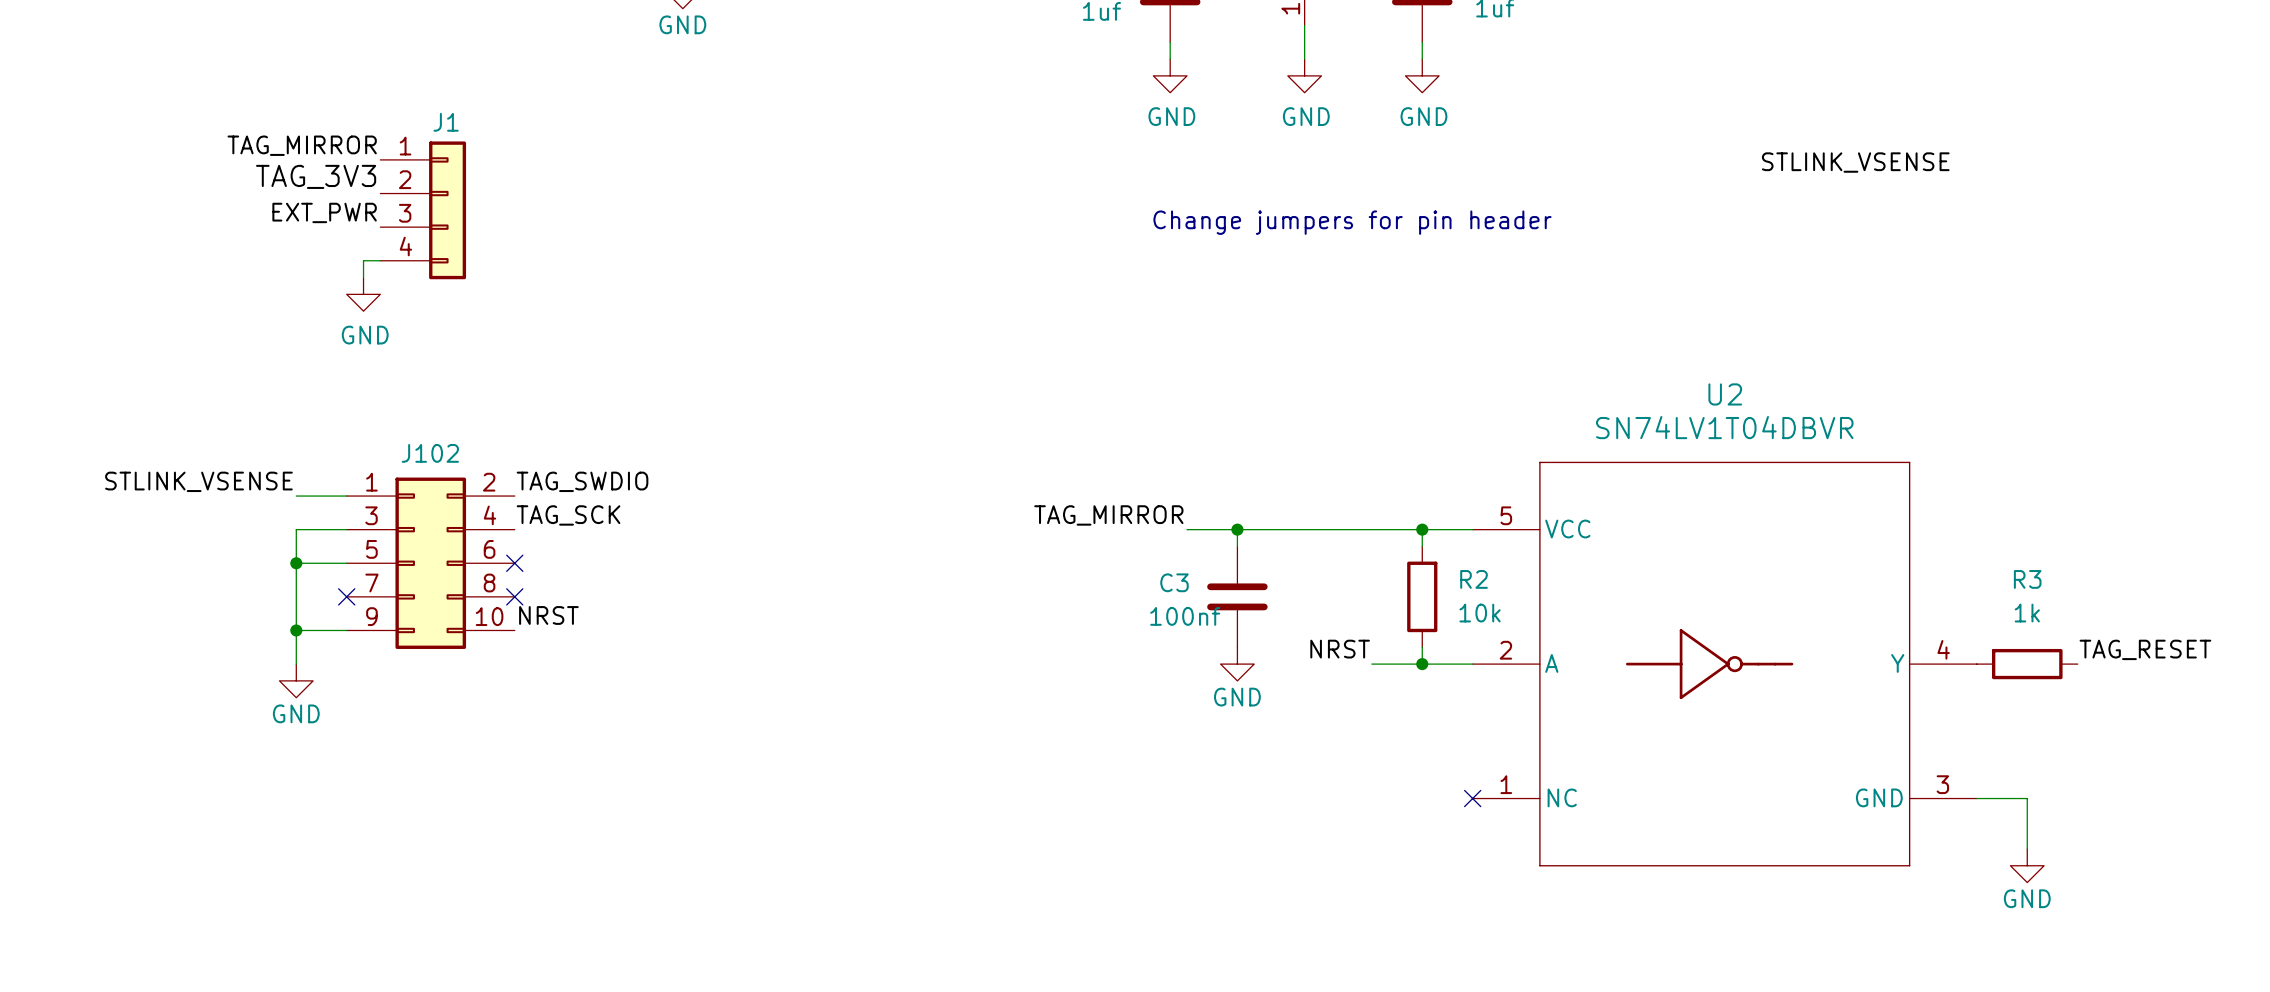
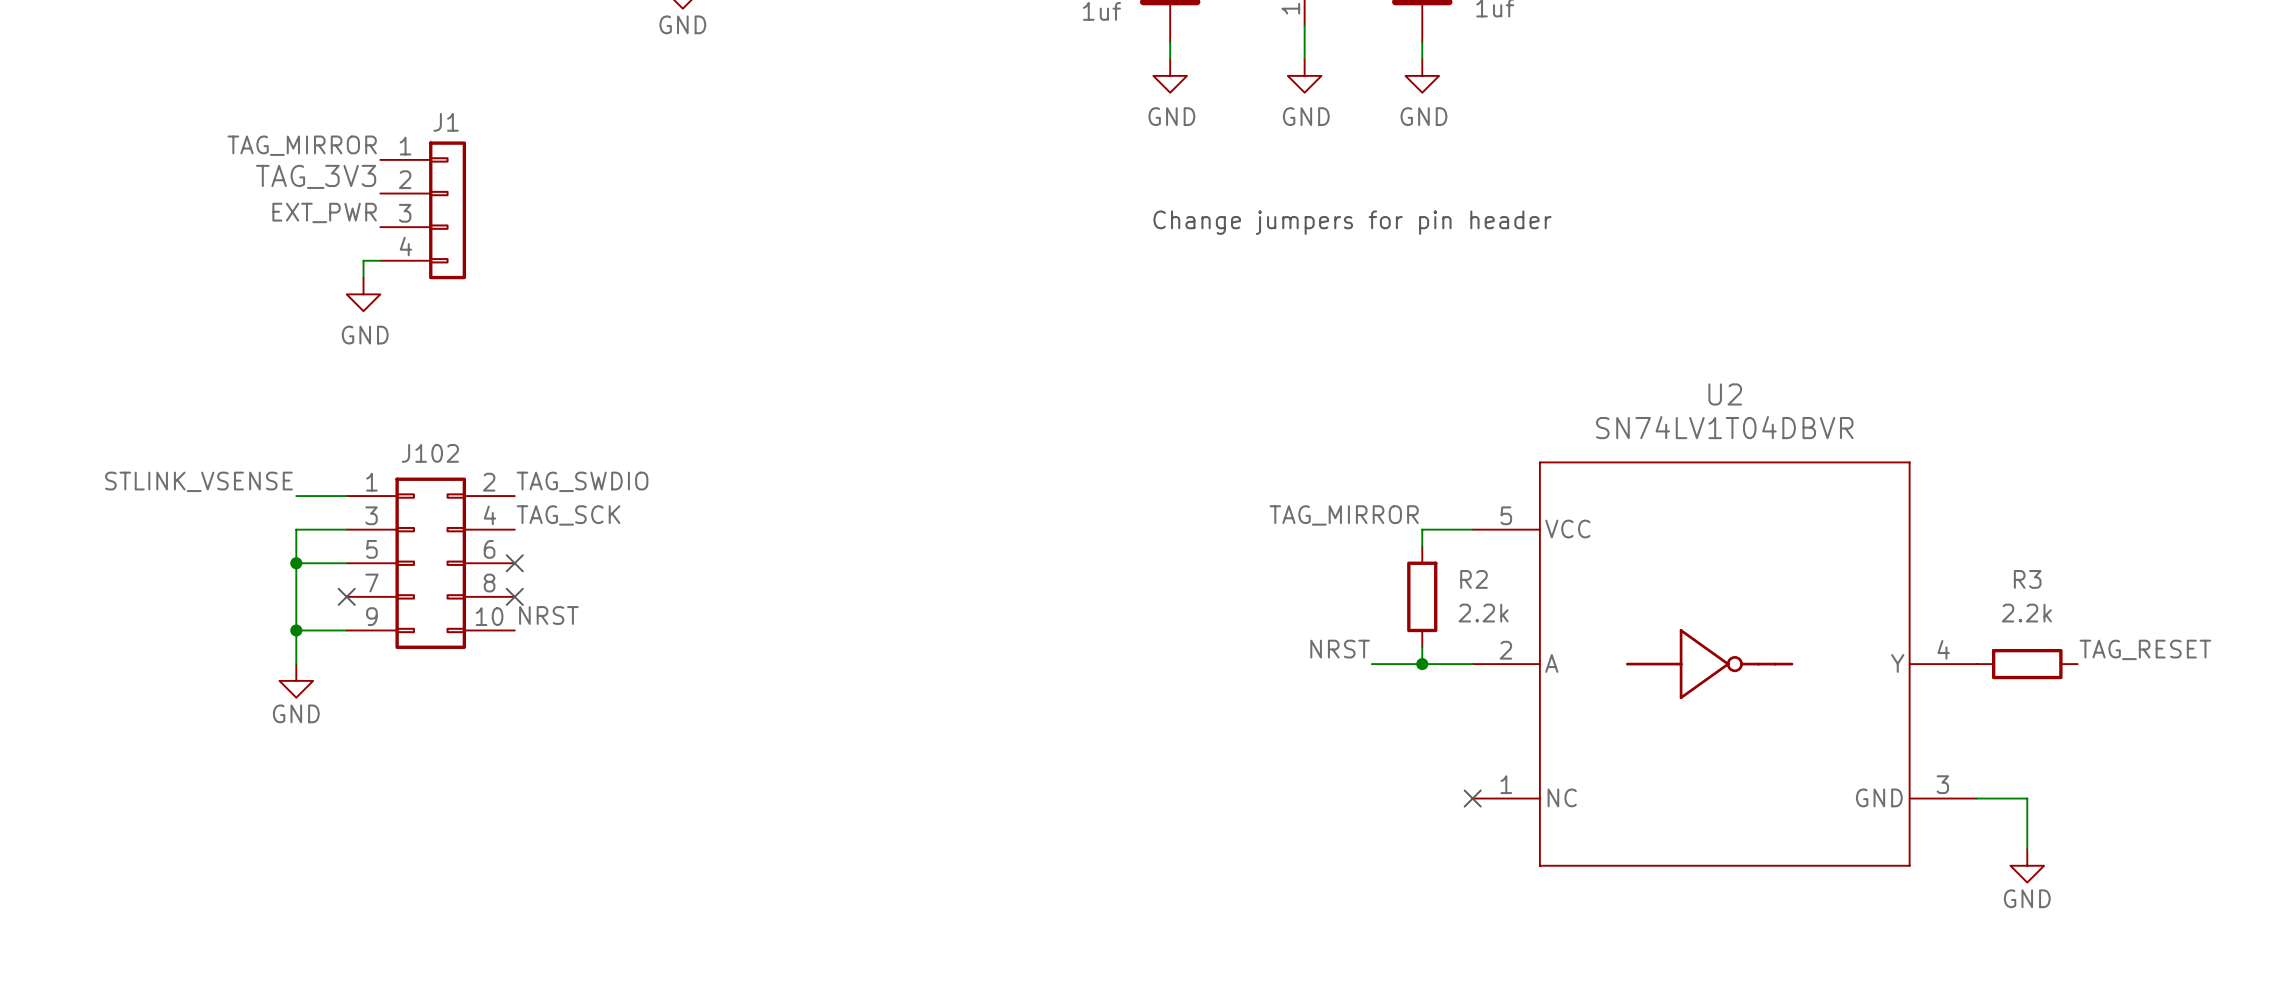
label: STLINK_VSENSE (1855, 162) -> none
label position: TAG_MIRROR (1108, 515) -> TAG_MIRROR (1344, 515)
wire: (1187, 529) (1422, 529) -> none
wire: (1237, 529) (1237, 546) -> none
junction: (1237, 529) -> none
junction: (1422, 529) -> none
C3: 100nf (1237, 596) -> none
R2 value: 10k (1480, 613) -> 2.2k (1483, 613)
R3 value: 1k (2027, 613) -> 2.2k (2026, 613)
power symbol: GND (1237, 664) -> none

